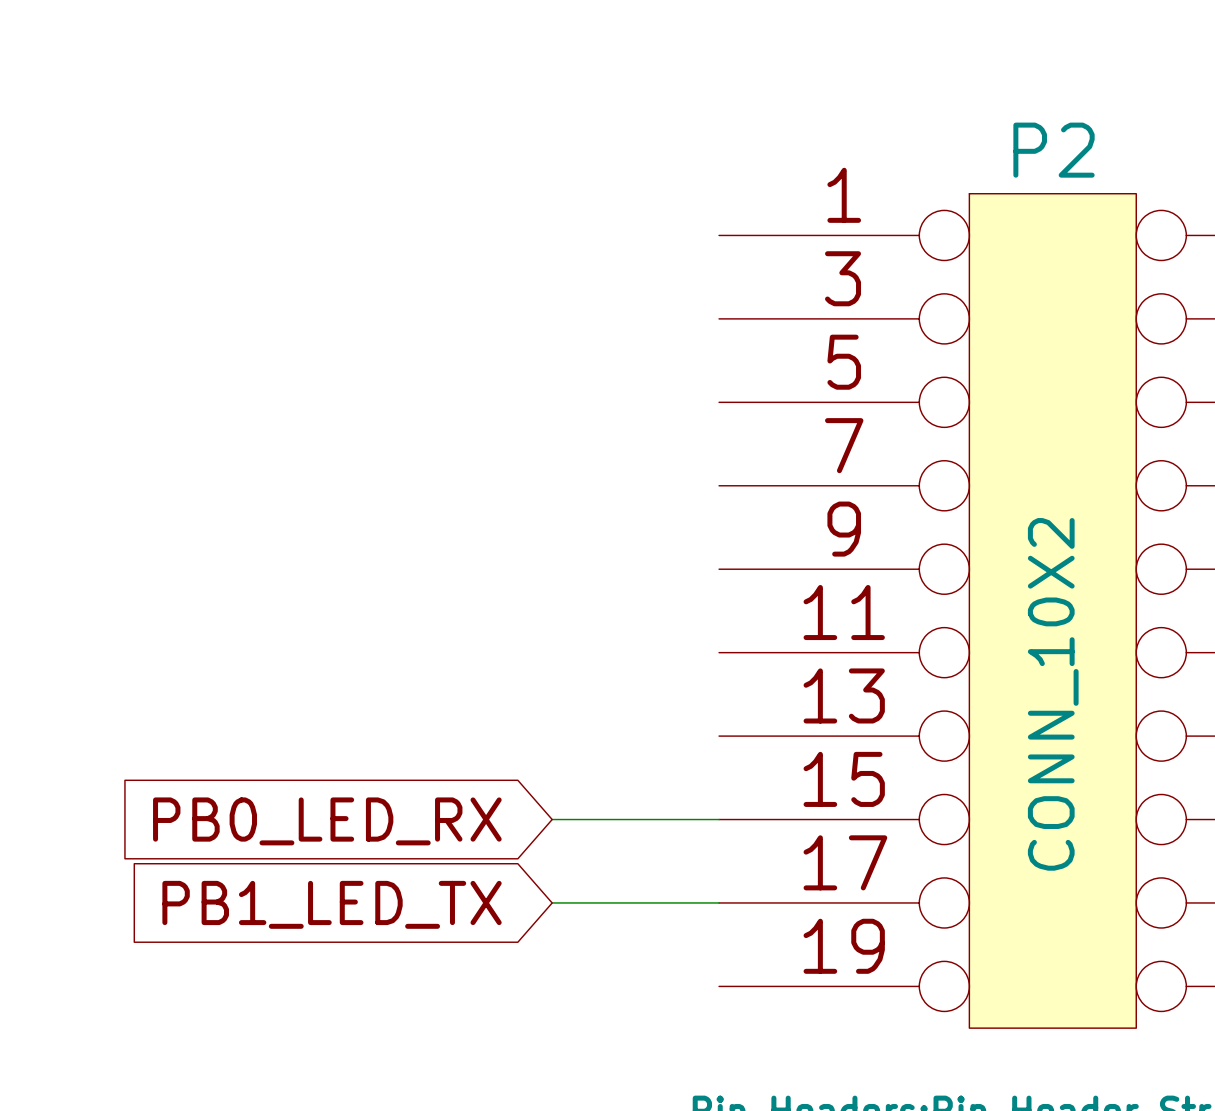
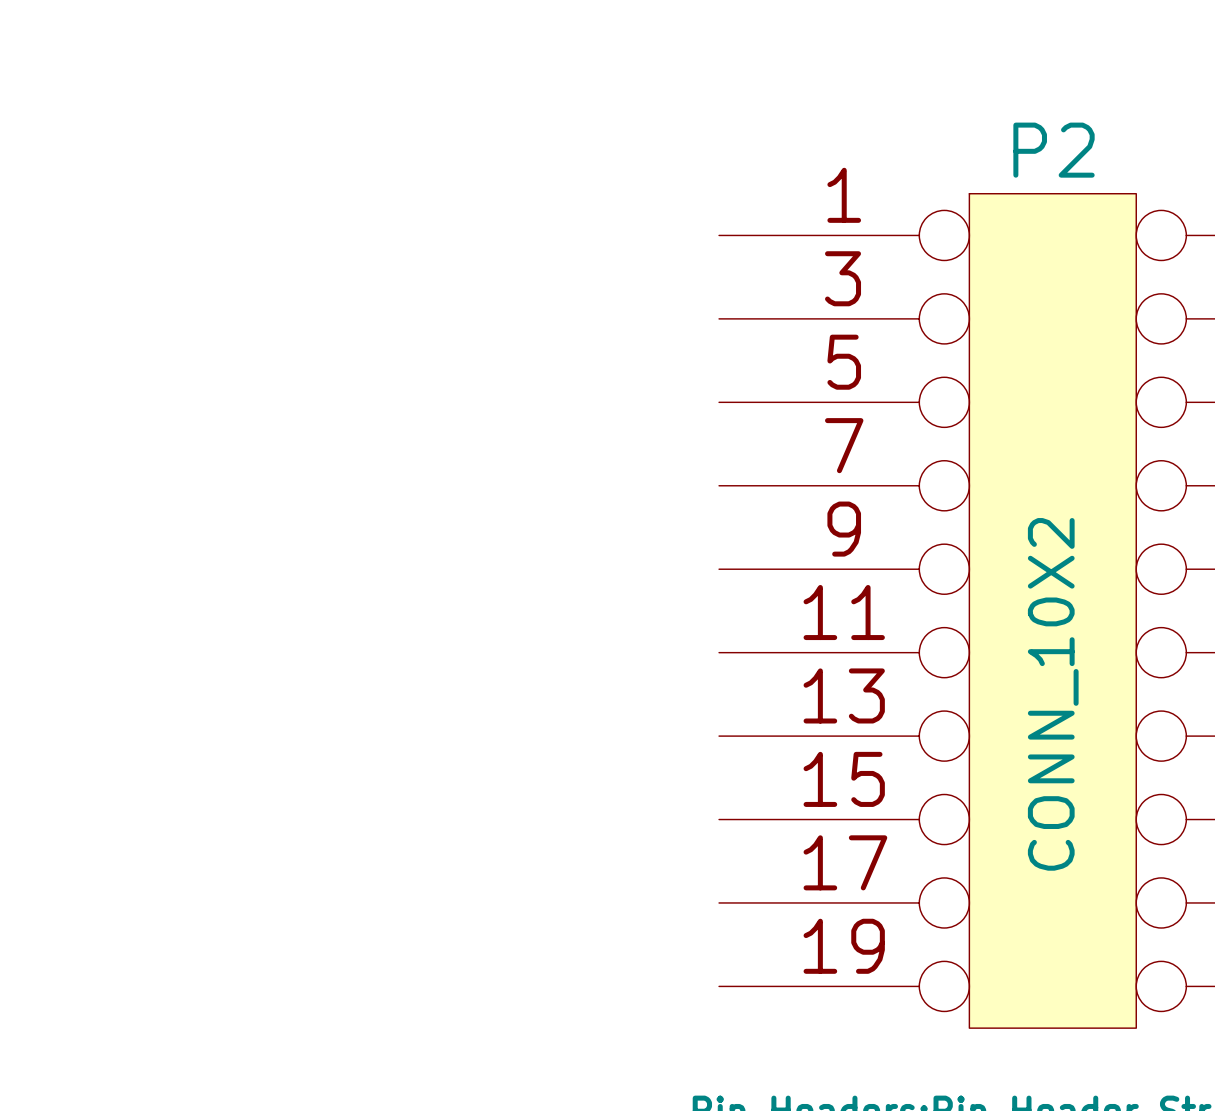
wire: (552, 819) (719, 819) -> none
global label: PB0_LED_RX (327, 821) -> none
wire: (552, 902) (719, 902) -> none
global label: PB1_LED_TX (332, 904) -> none

